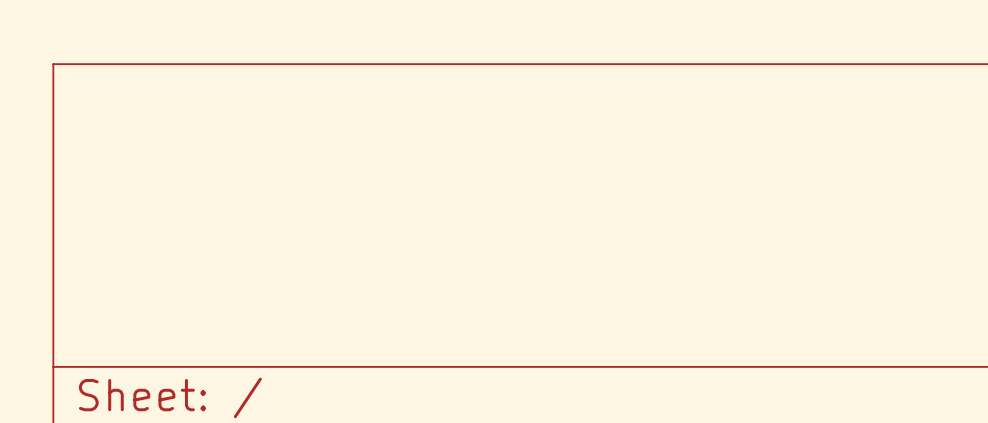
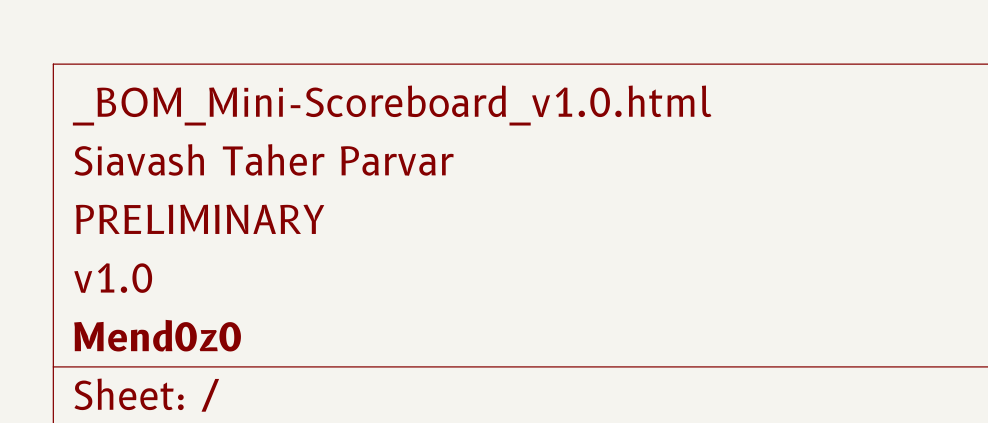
title block: none -> _BOM_Mini-Scoreboard_v1.0.html (392, 105)
title block: none -> Siavash Taher Parvar (264, 159)
title block: none -> PRELIMINARY (200, 219)
title block: none -> v1.0 (113, 278)
title block: none -> Mend0z0 (157, 335)

